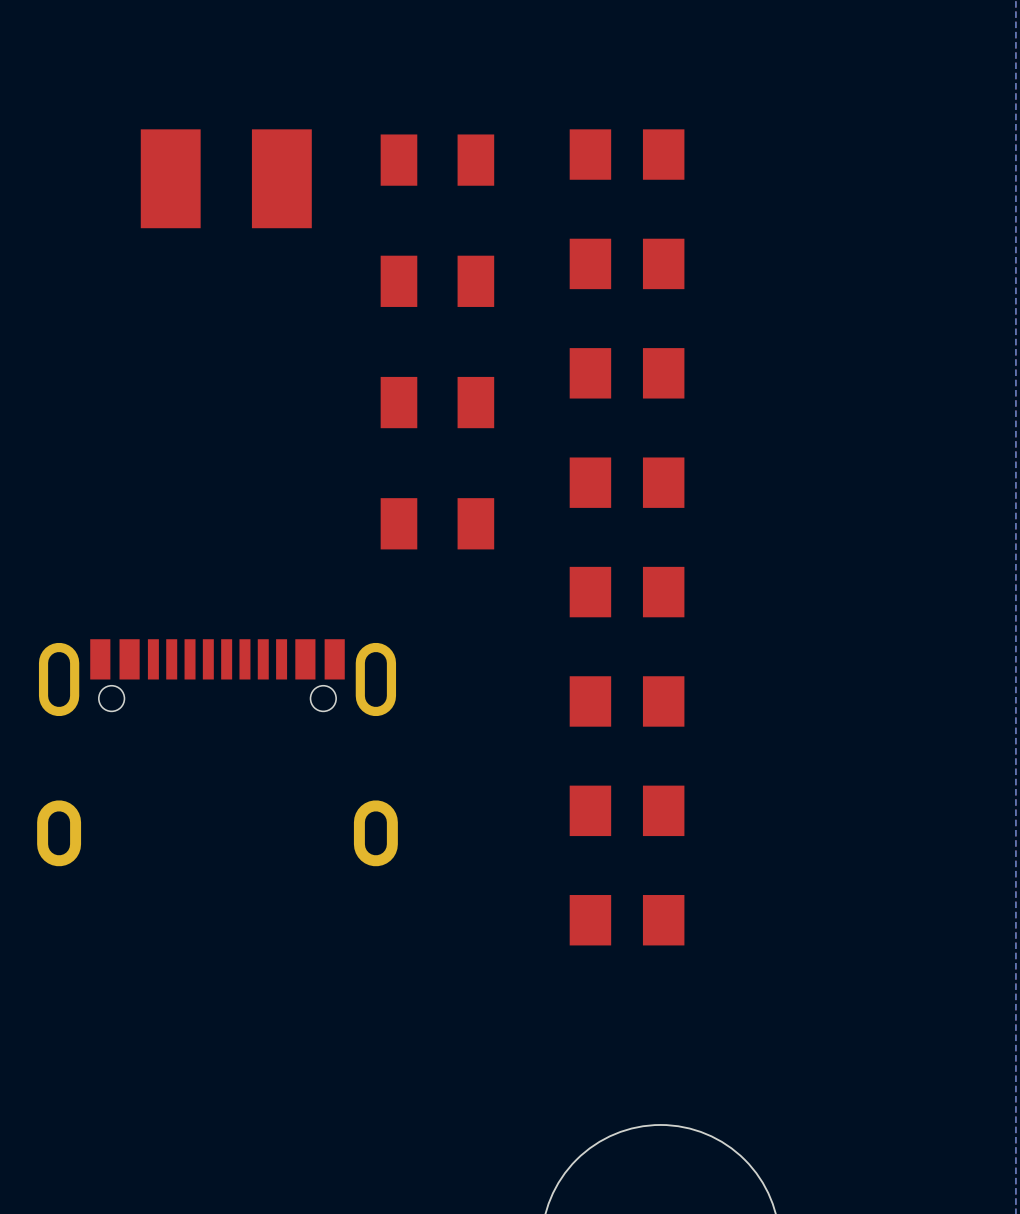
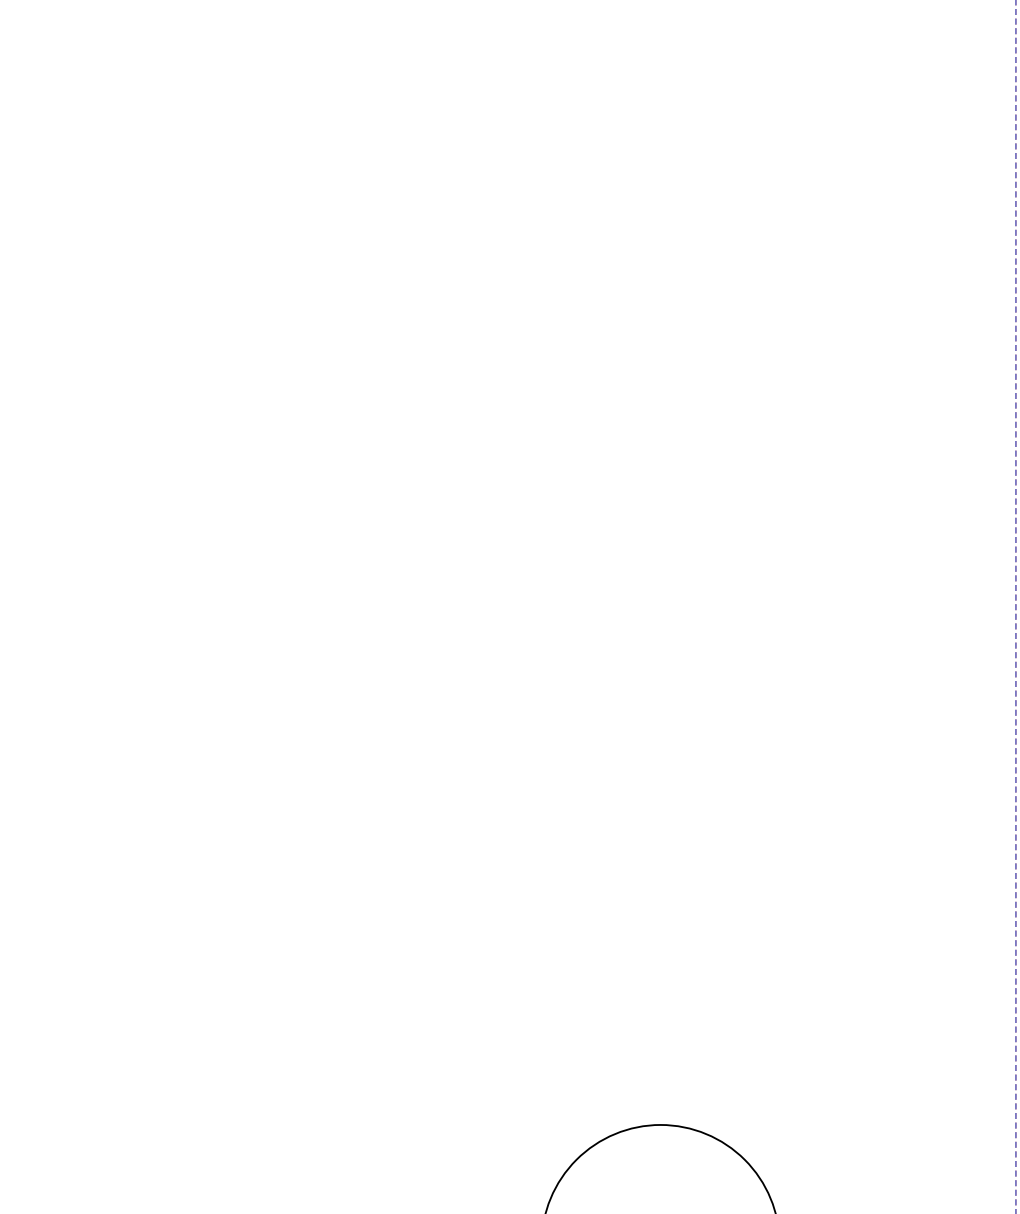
part: (627, 154) -> none
part: (437, 160) -> none
part: (226, 178) -> none
part: (627, 263) -> none
part: (437, 281) -> none
part: (627, 373) -> none
part: (437, 402) -> none
part: (627, 482) -> none
part: (437, 523) -> none
part: (627, 592) -> none
part: (627, 701) -> none
part: (217, 752) -> none
part: (627, 810) -> none
part: (627, 920) -> none

